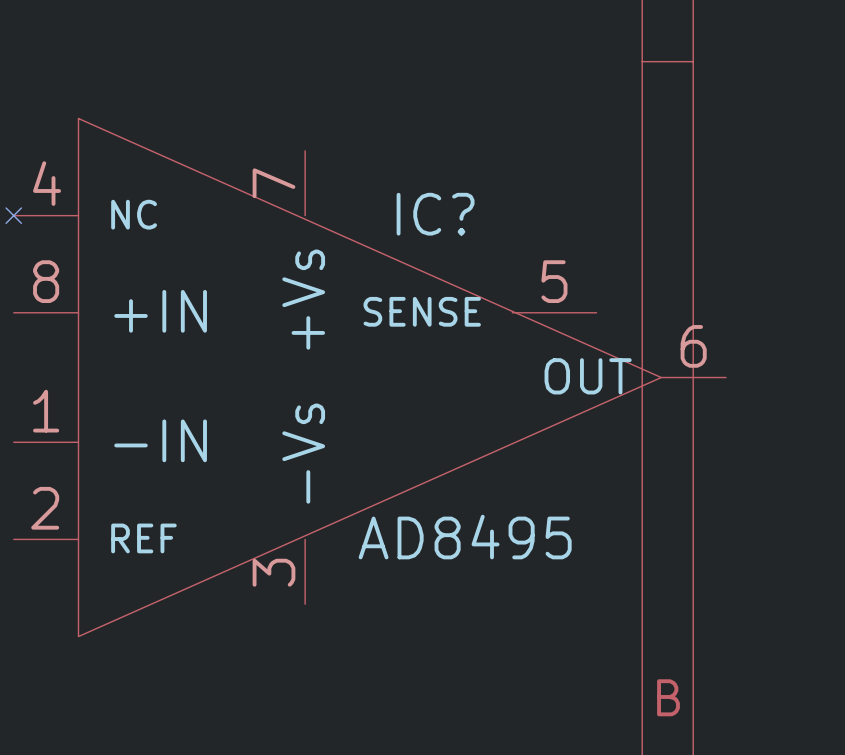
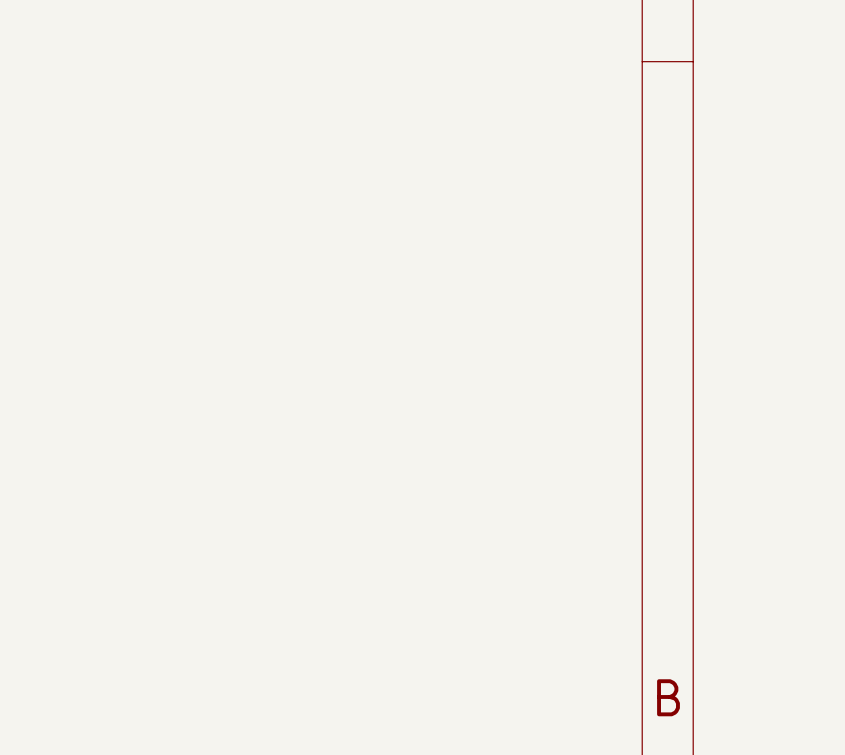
IC?: AD8495 (366, 377) -> none

